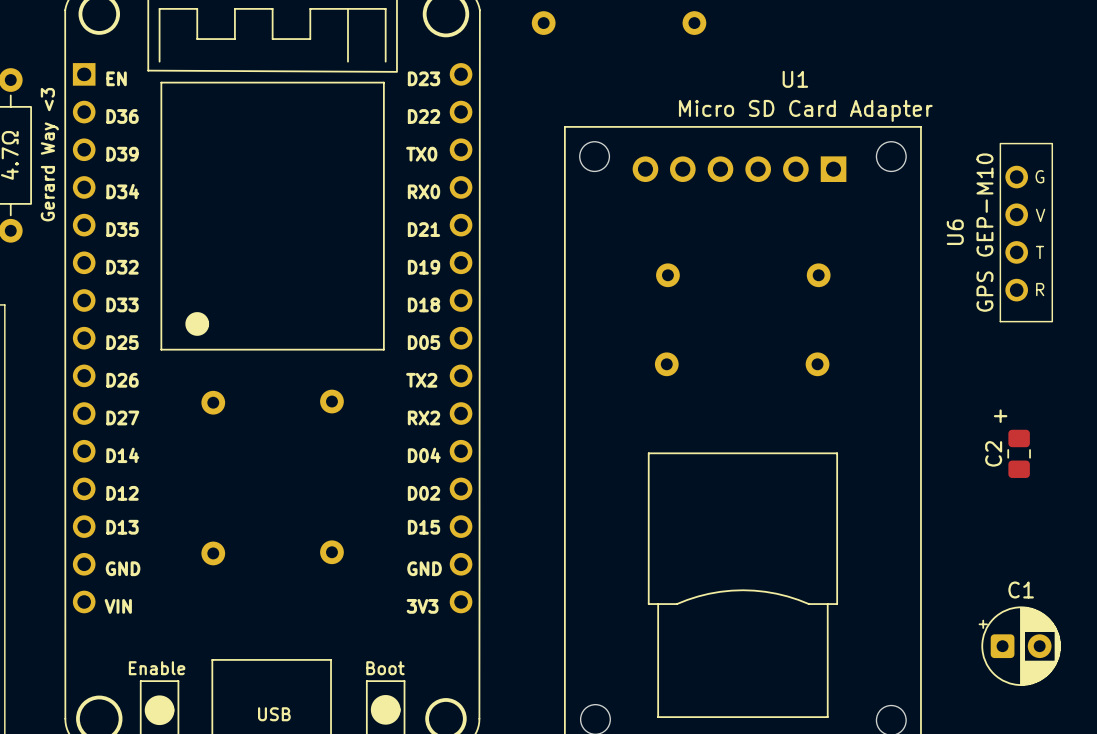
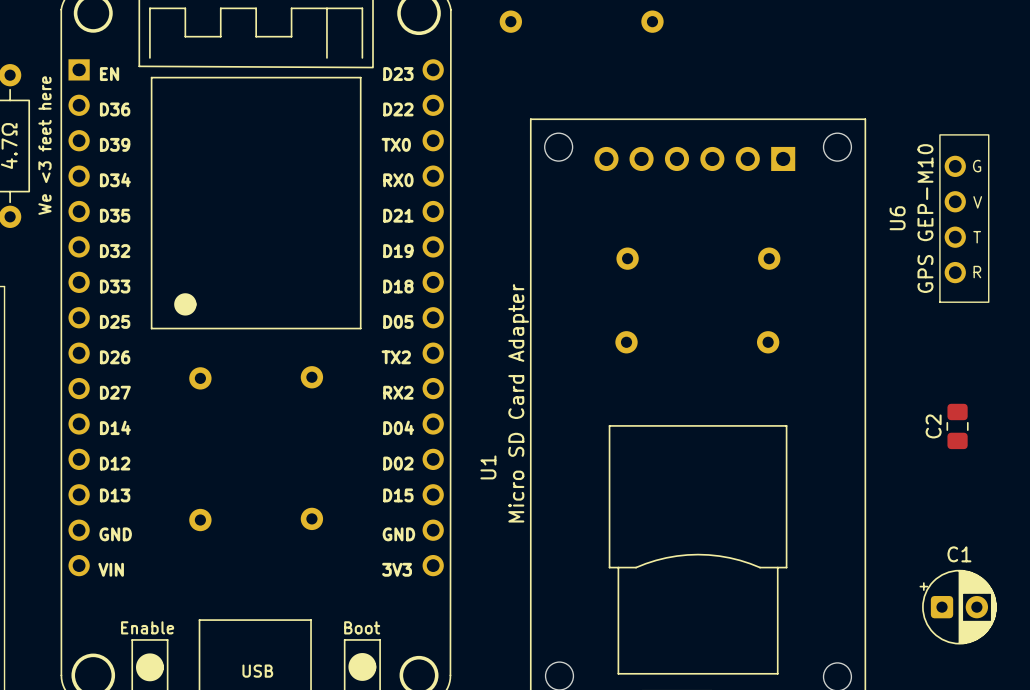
U1 name rotation: 0° (795, 79) -> 90° counterclockwise (488, 467)
U1 name position: U1 (795, 79) -> U1 (488, 467)
U1 value rotation: 0° (805, 110) -> 90° counterclockwise (518, 403)
U1 value position: Micro SD Card Adapter (805, 110) -> Micro SD Card Adapter (518, 403)
text: Gerard Way <3 (49, 154) -> We <3 feet here (44, 145)
text: + (1000, 416) -> none

